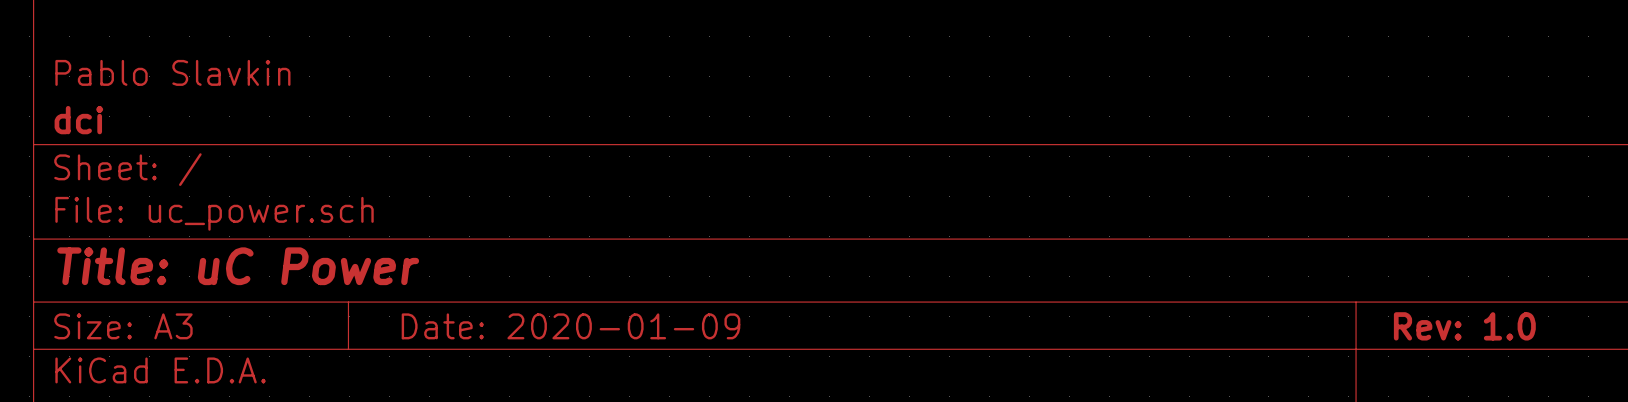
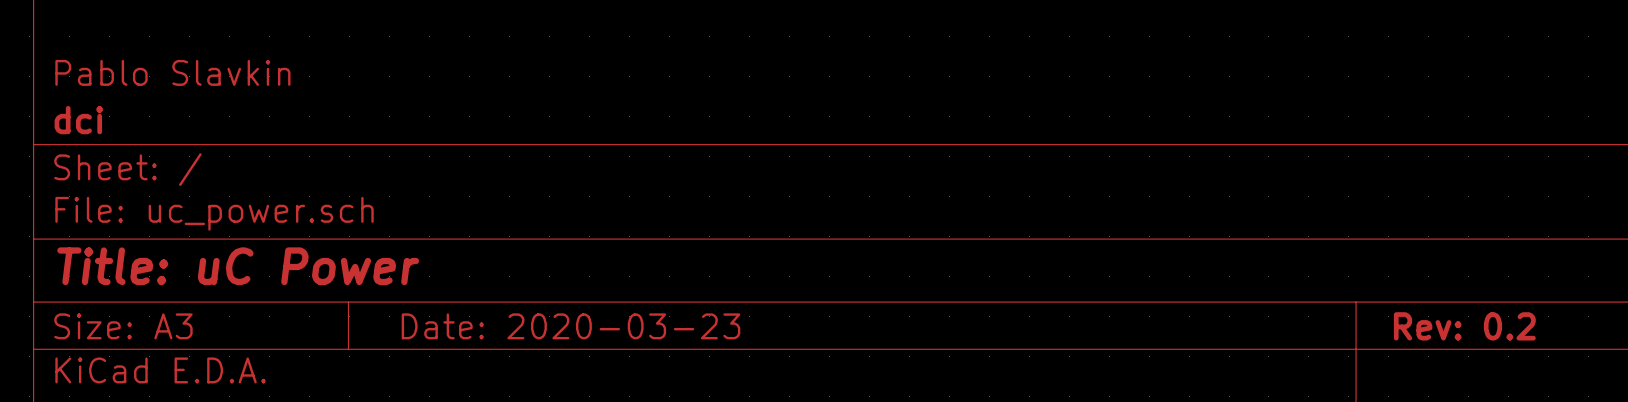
title block: Date: 2020-01-09 (571, 326) -> Date: 2020-03-23 (571, 326)
title block: Rev: 1.0 (1464, 326) -> Rev: 0.2 (1464, 326)

